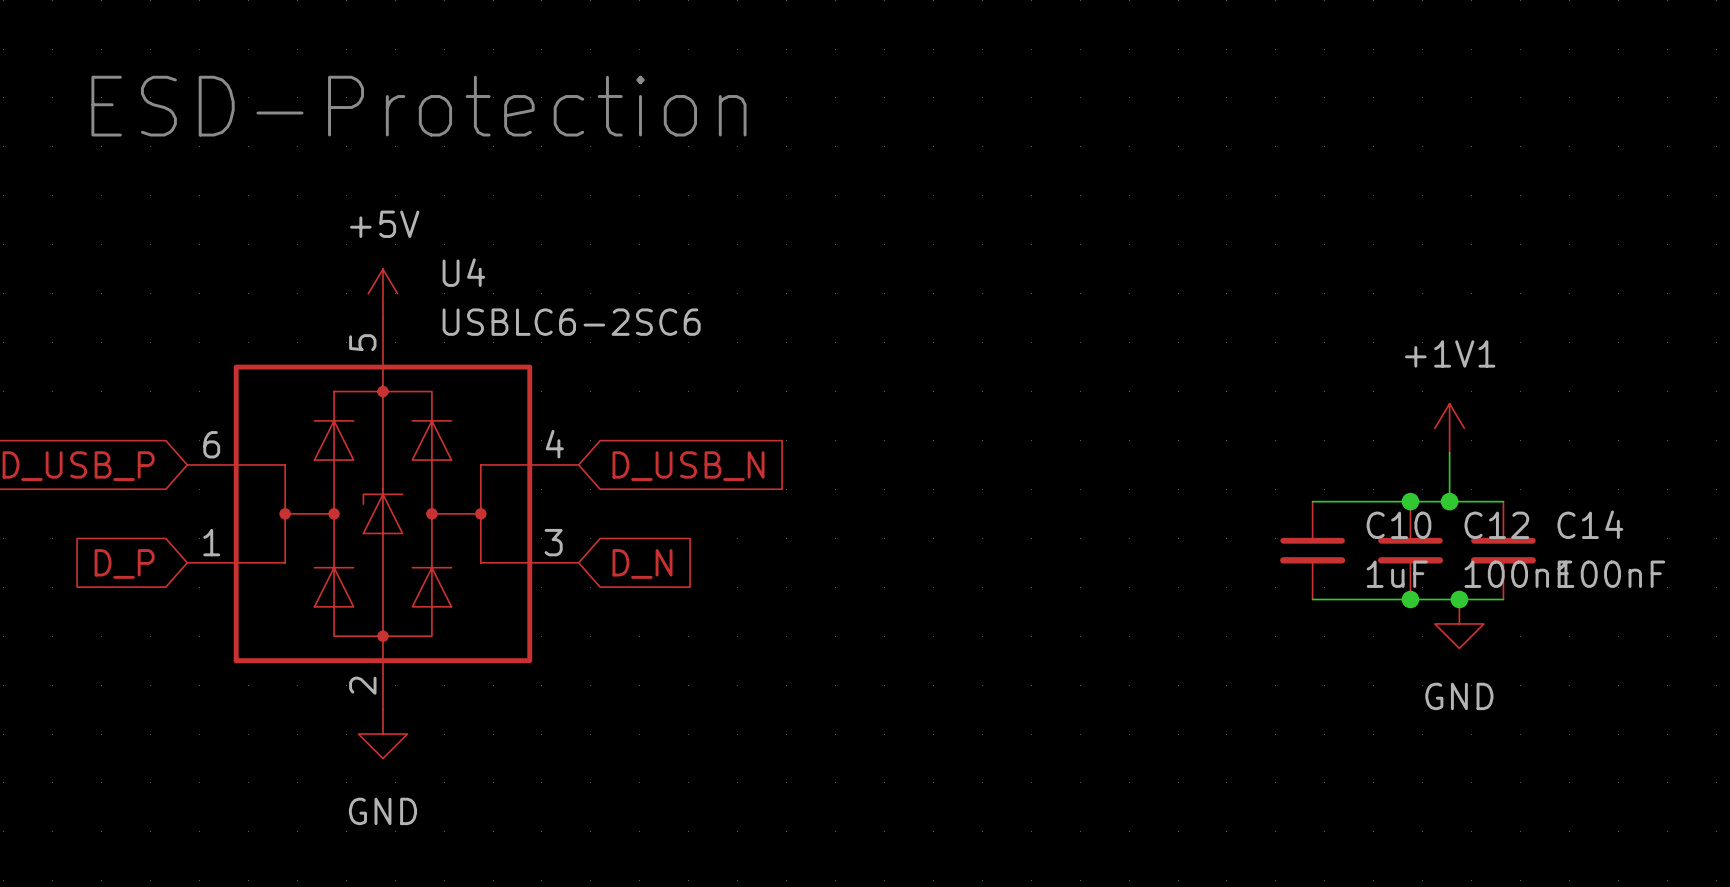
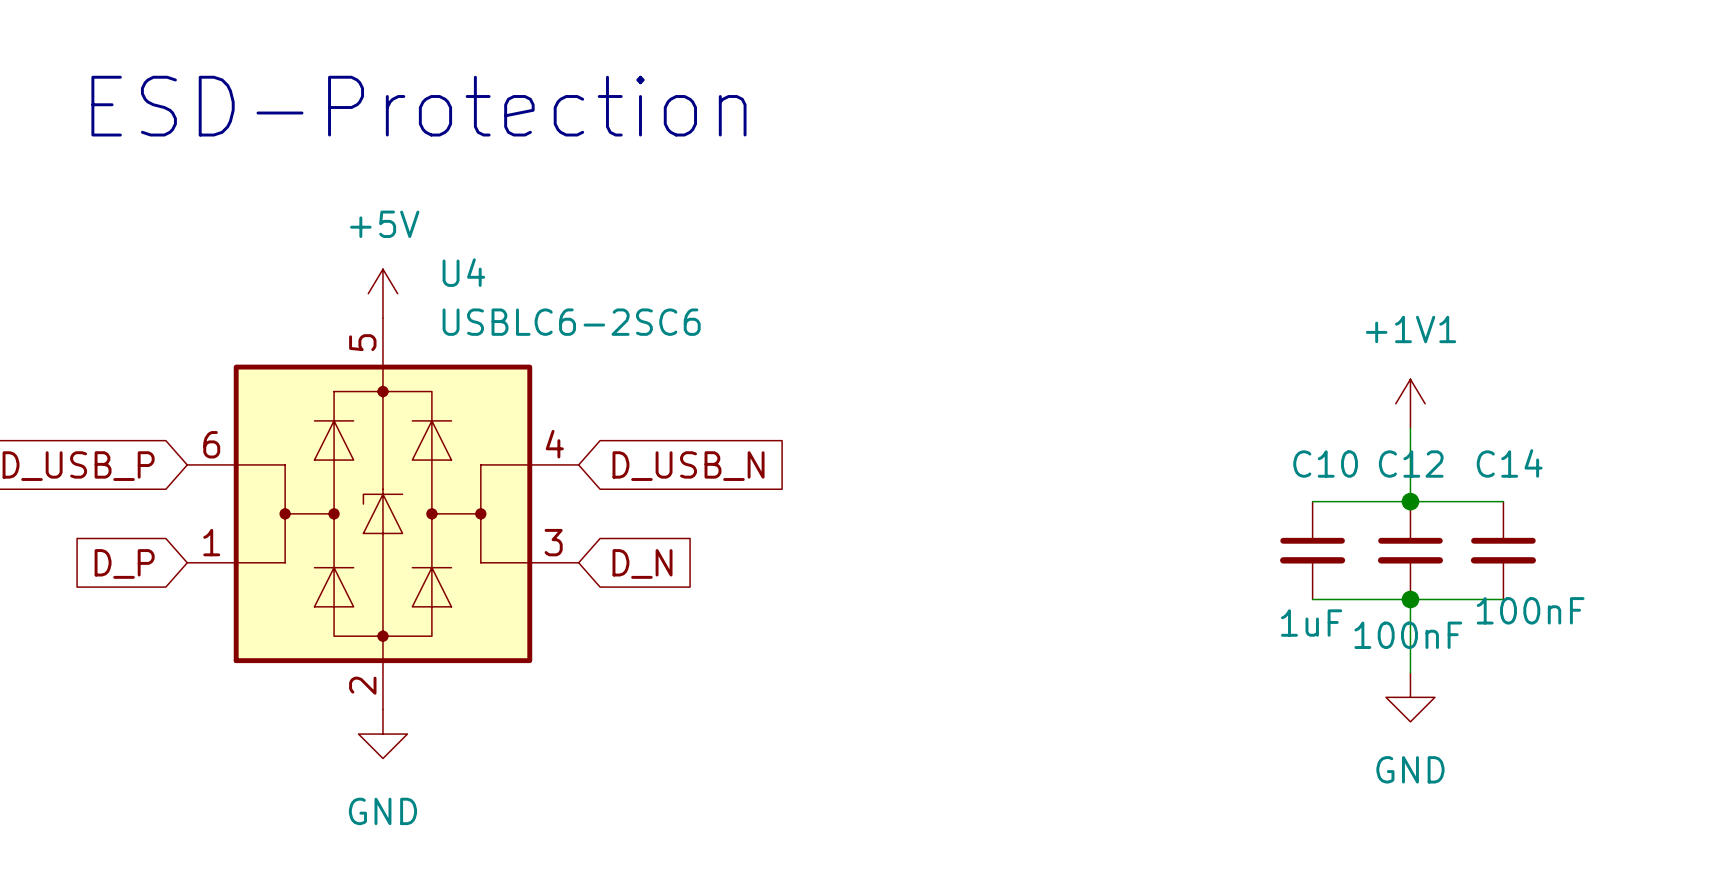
wire: none -> (1410, 428) (1410, 501)
power symbol position: +1V1 (1449, 428) -> +1V1 (1410, 403)
wire: (1449, 452) (1449, 501) -> none
junction: (1449, 501) -> none
C14 name position: C14 (1590, 524) -> C14 (1509, 463)
C10 name position: C10 (1398, 525) -> C10 (1325, 464)
C12 name position: C12 (1496, 525) -> C12 (1411, 464)
C10 value position: 1uF (1397, 574) -> 1uF (1311, 623)
C12 value position: 100nF (1518, 574) -> 100nF (1408, 635)
C14 value position: 100nF (1611, 574) -> 100nF (1530, 610)
wire: none -> (1410, 599) (1410, 672)
junction: (1459, 599) -> none
power symbol position: GND (1459, 623) -> GND (1410, 697)

